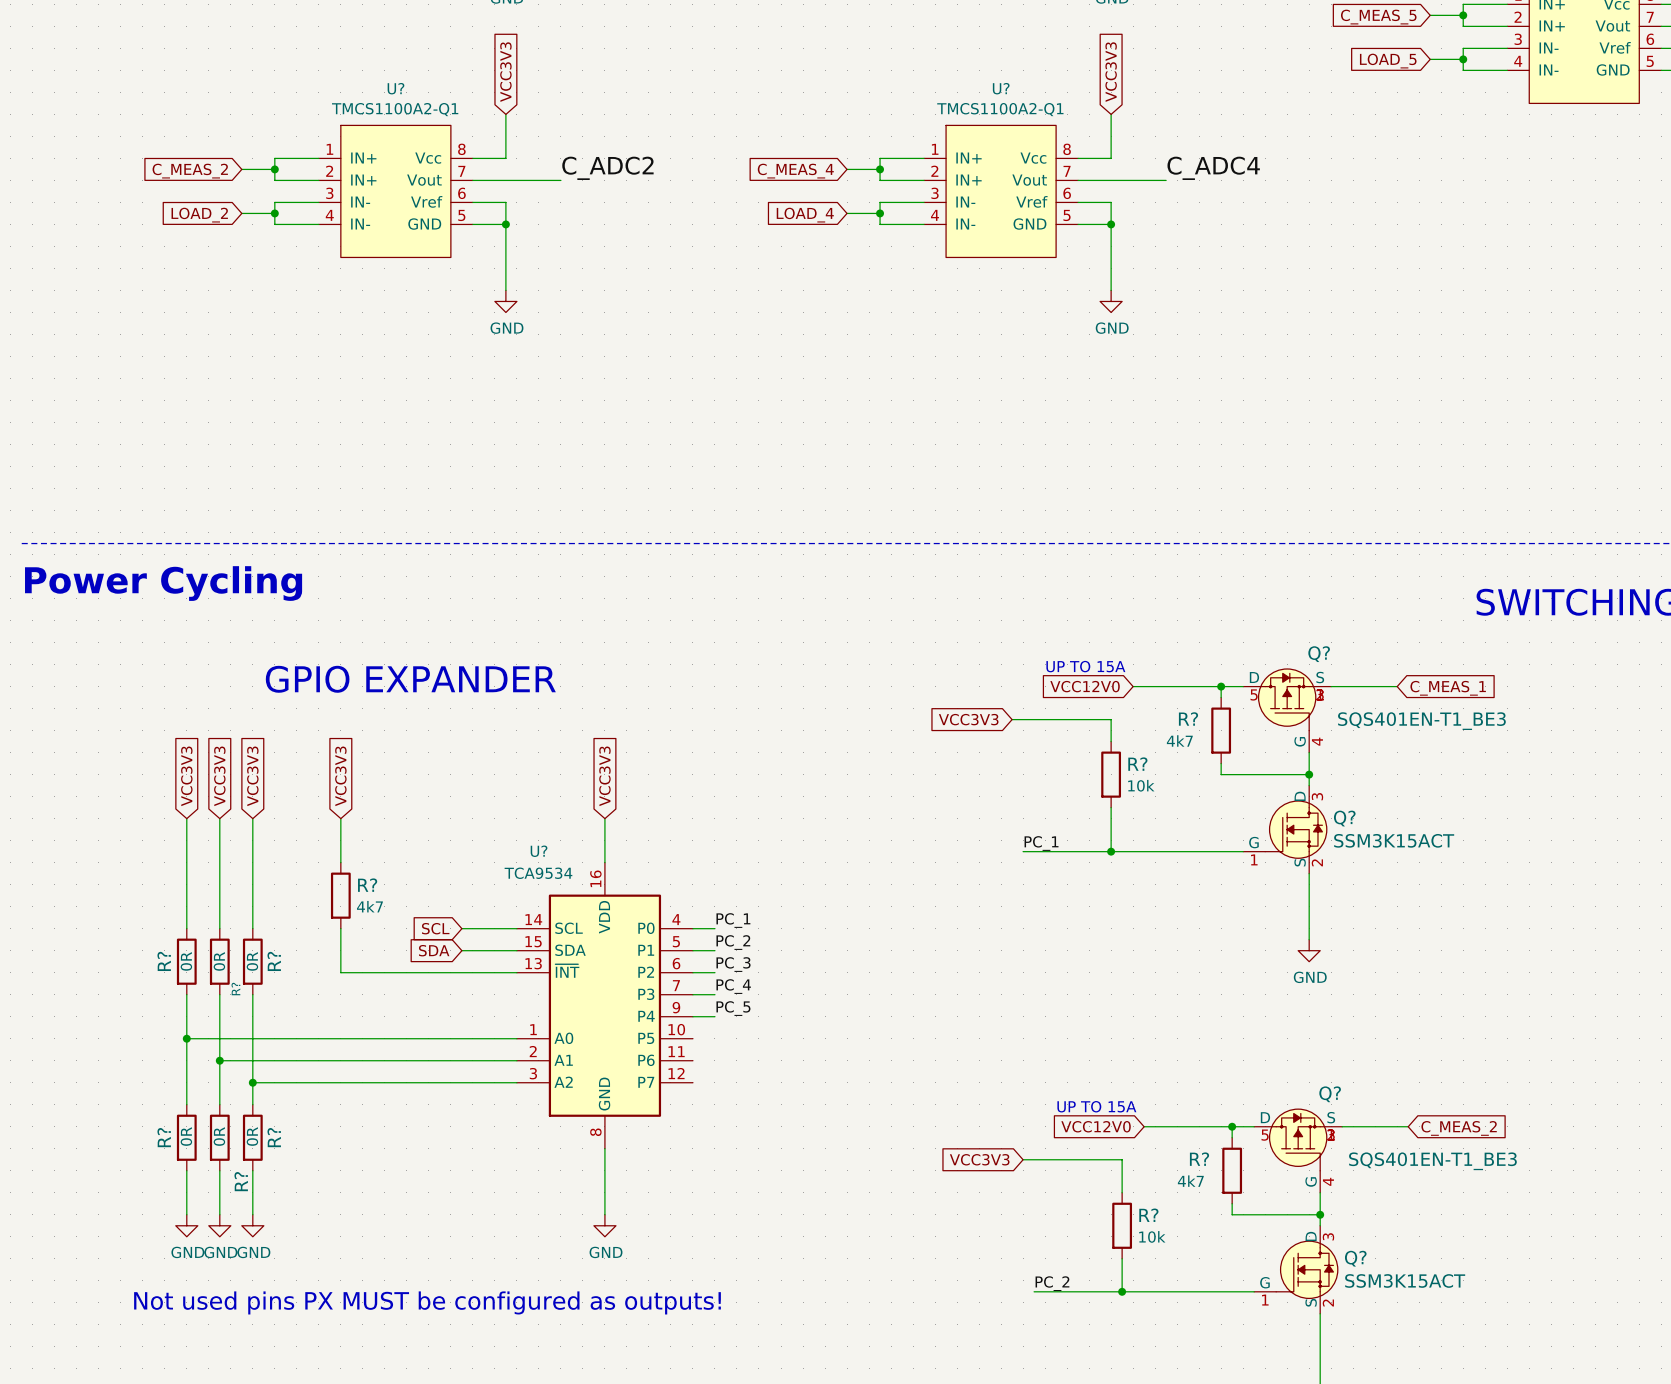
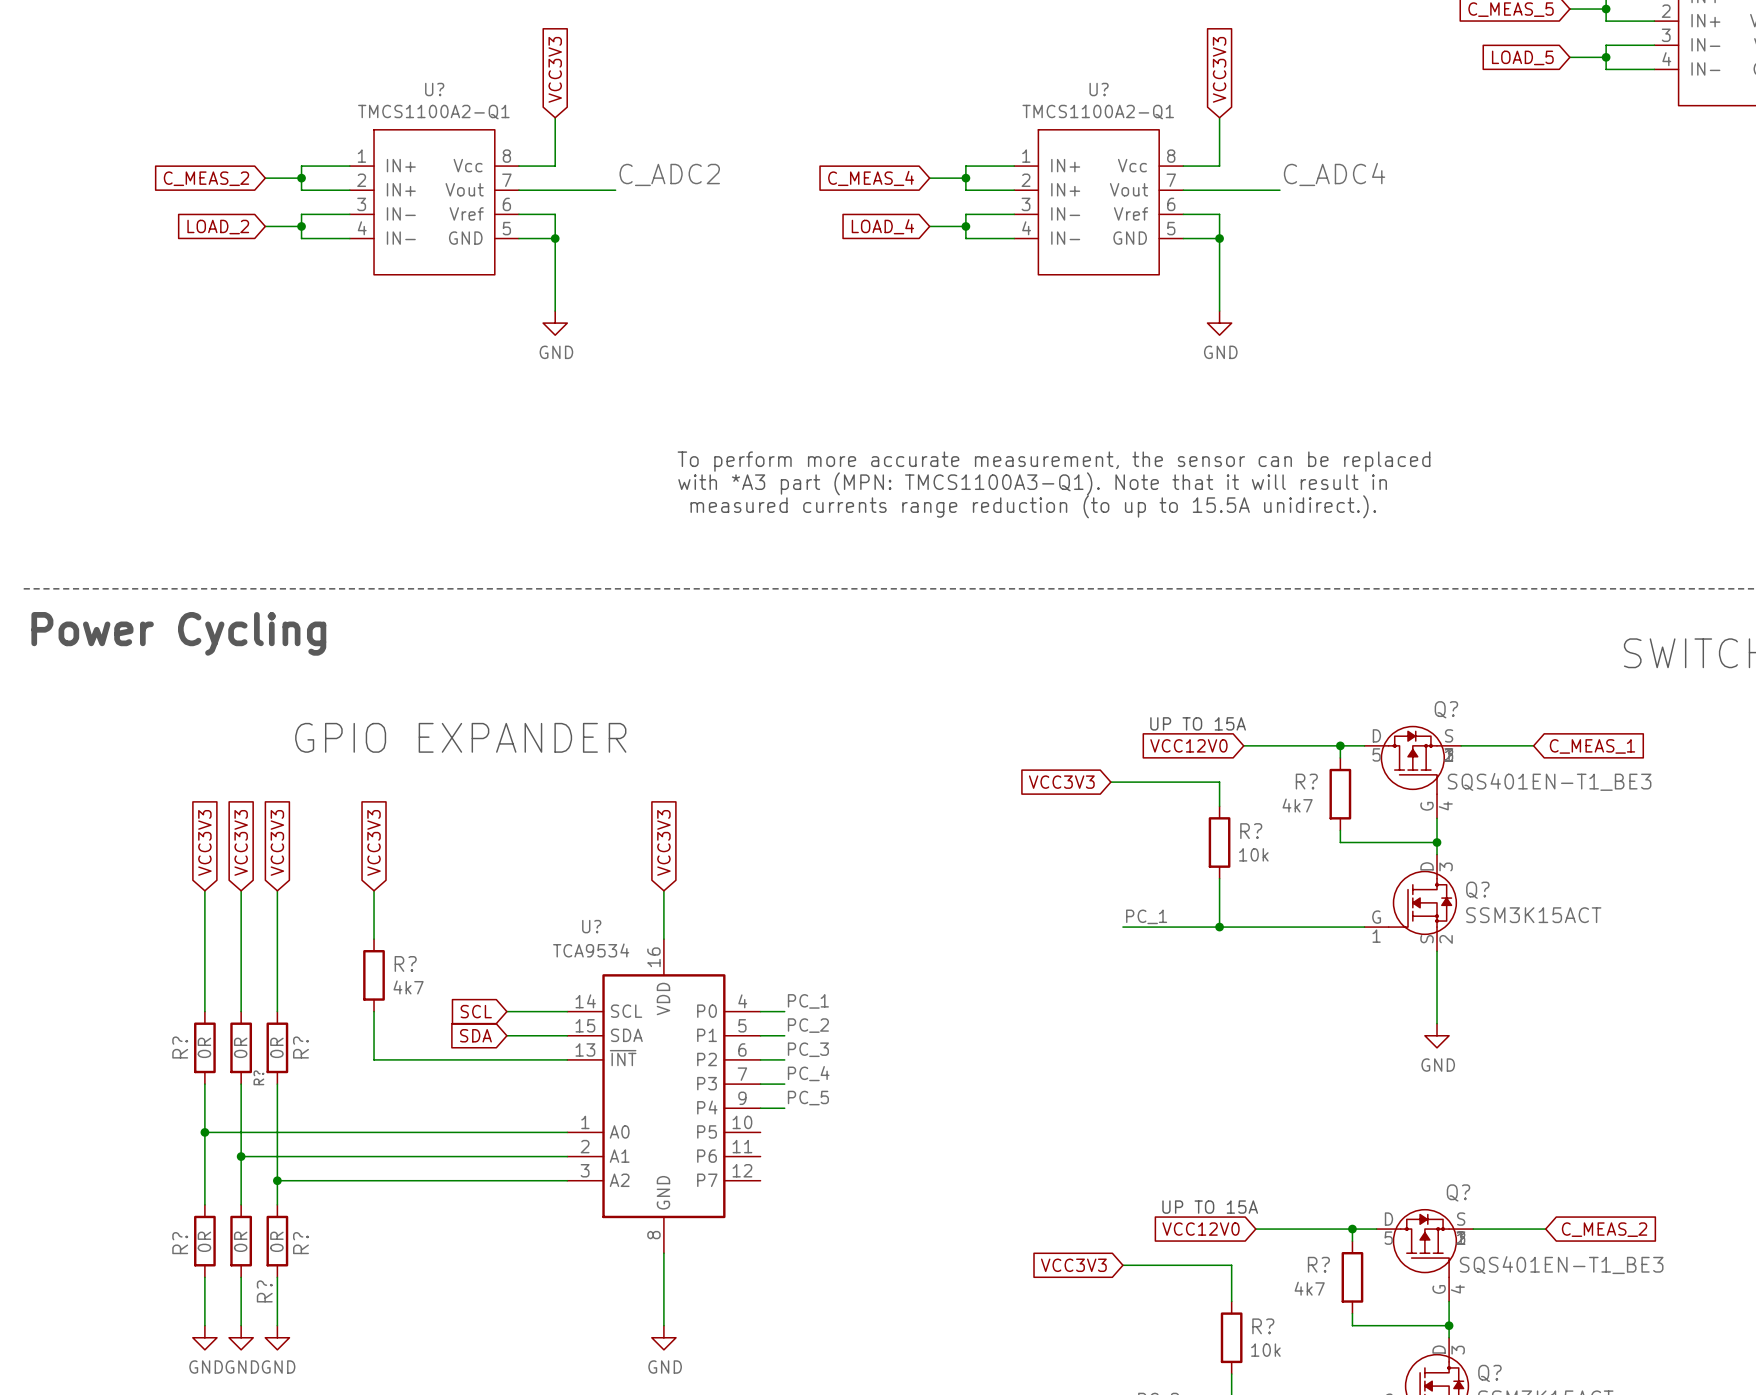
text: none -> To perform more accurate measurement, the sensor can be replaced (1053, 461)
text: none -> with *A3 part (MPN: TMCS1100A3-Q1). Note that it will result in (1032, 483)
text: none -> measured currents range reduction (to up to 15.5A unidirect.). (1033, 506)

